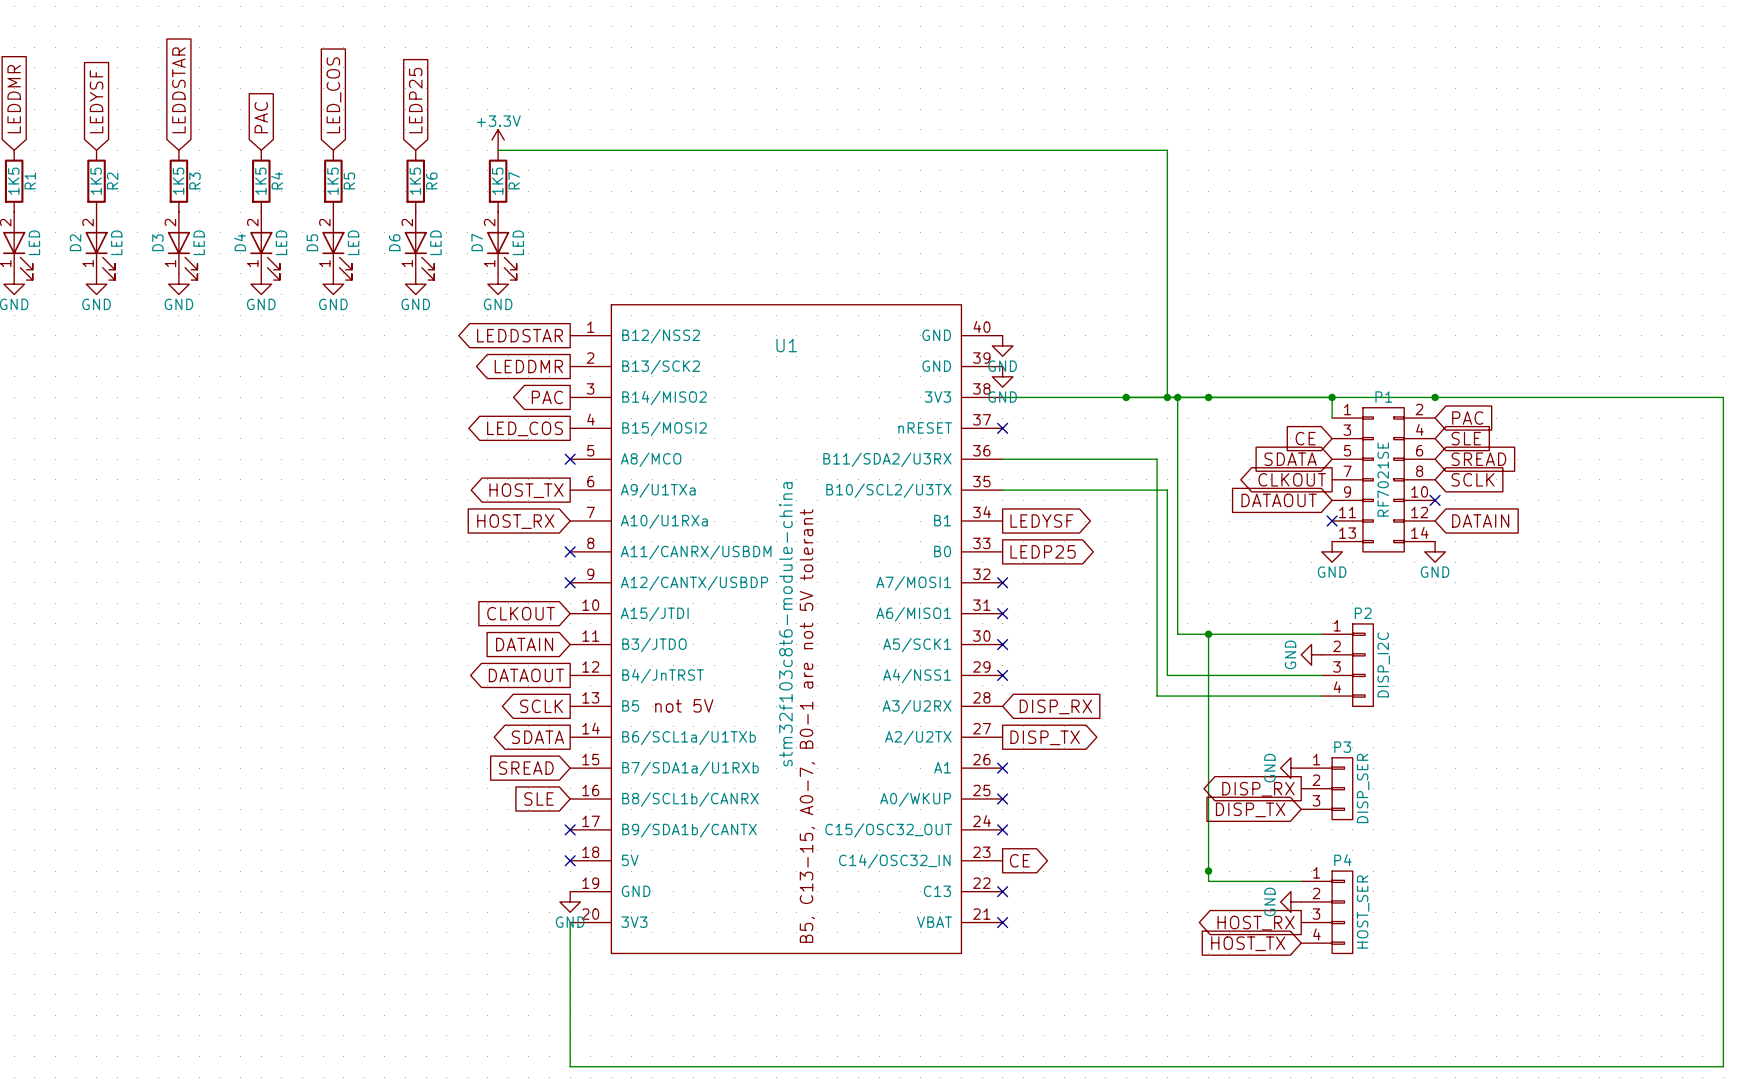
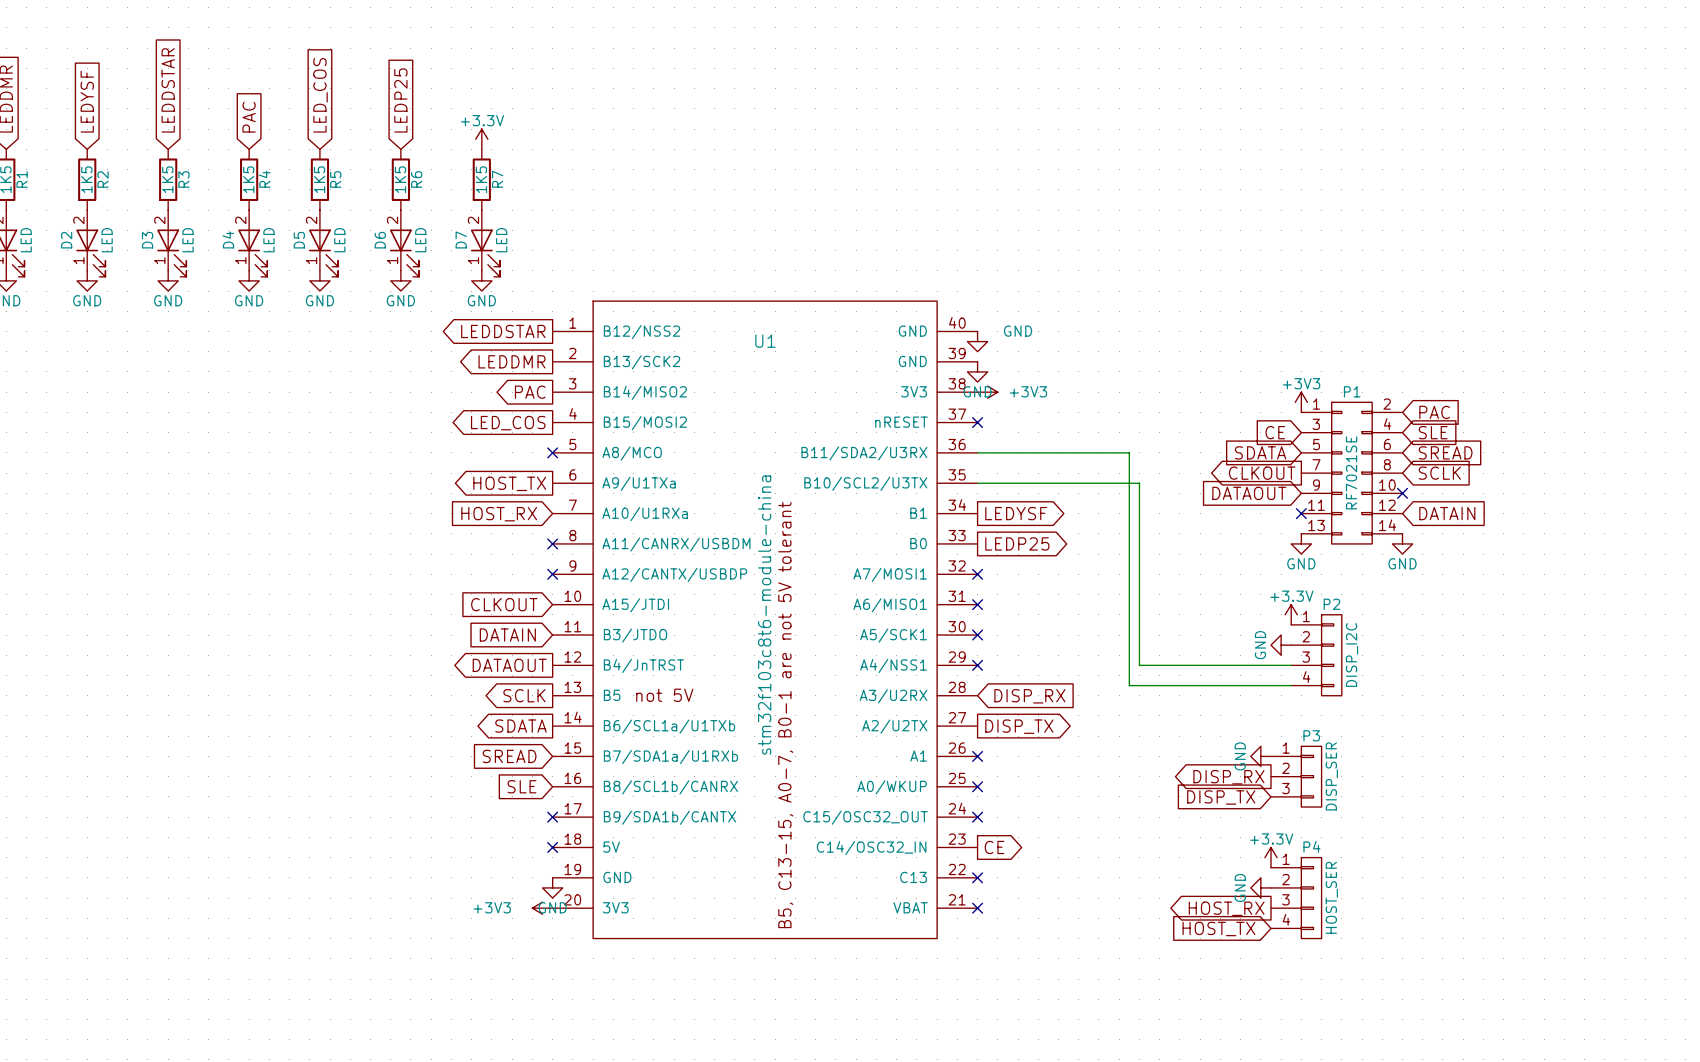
wire: (498, 150) (1167, 150) (1167, 397) -> none
power symbol text position: GND (1002, 366) -> GND (1018, 331)
wire: (1002, 397) (1723, 397) (1723, 1066) (570, 1066) (570, 922) -> none
power symbol: none -> +3V3 (987, 392)
junction: (1126, 397) -> none
junction: (1167, 397) -> none
wire: (1177, 397) (1177, 634) (1321, 634) -> none
junction: (1177, 397) -> none
junction: (1208, 397) -> none
junction: (1332, 397) -> none
junction: (1435, 397) -> none
power symbol: none -> +3V3 (1301, 402)
power symbol: none -> +3.3V (1291, 614)
wire: (1208, 634) (1208, 881) (1301, 881) -> none
junction: (1208, 634) -> none
junction: (1208, 871) -> none
power symbol: none -> +3.3V (1270, 857)
power symbol: none -> +3V3 (542, 908)

